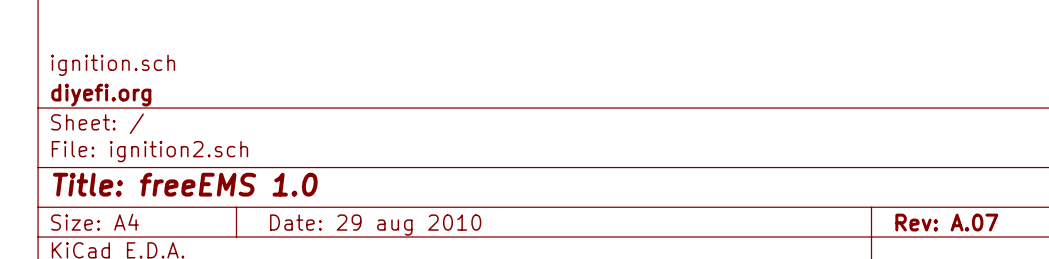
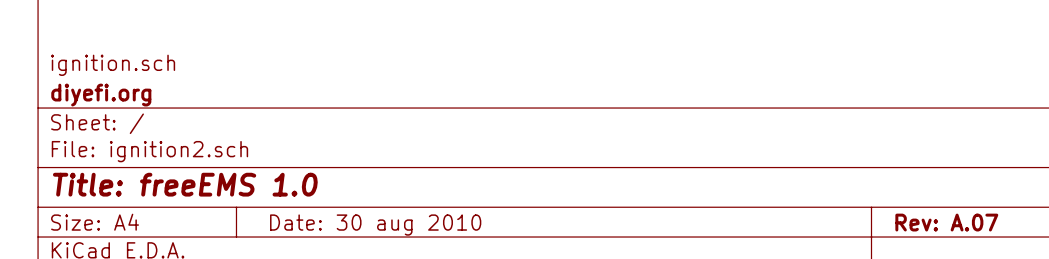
title block: Date: 29 aug 2010 (375, 225) -> Date: 30 aug 2010 (375, 225)

